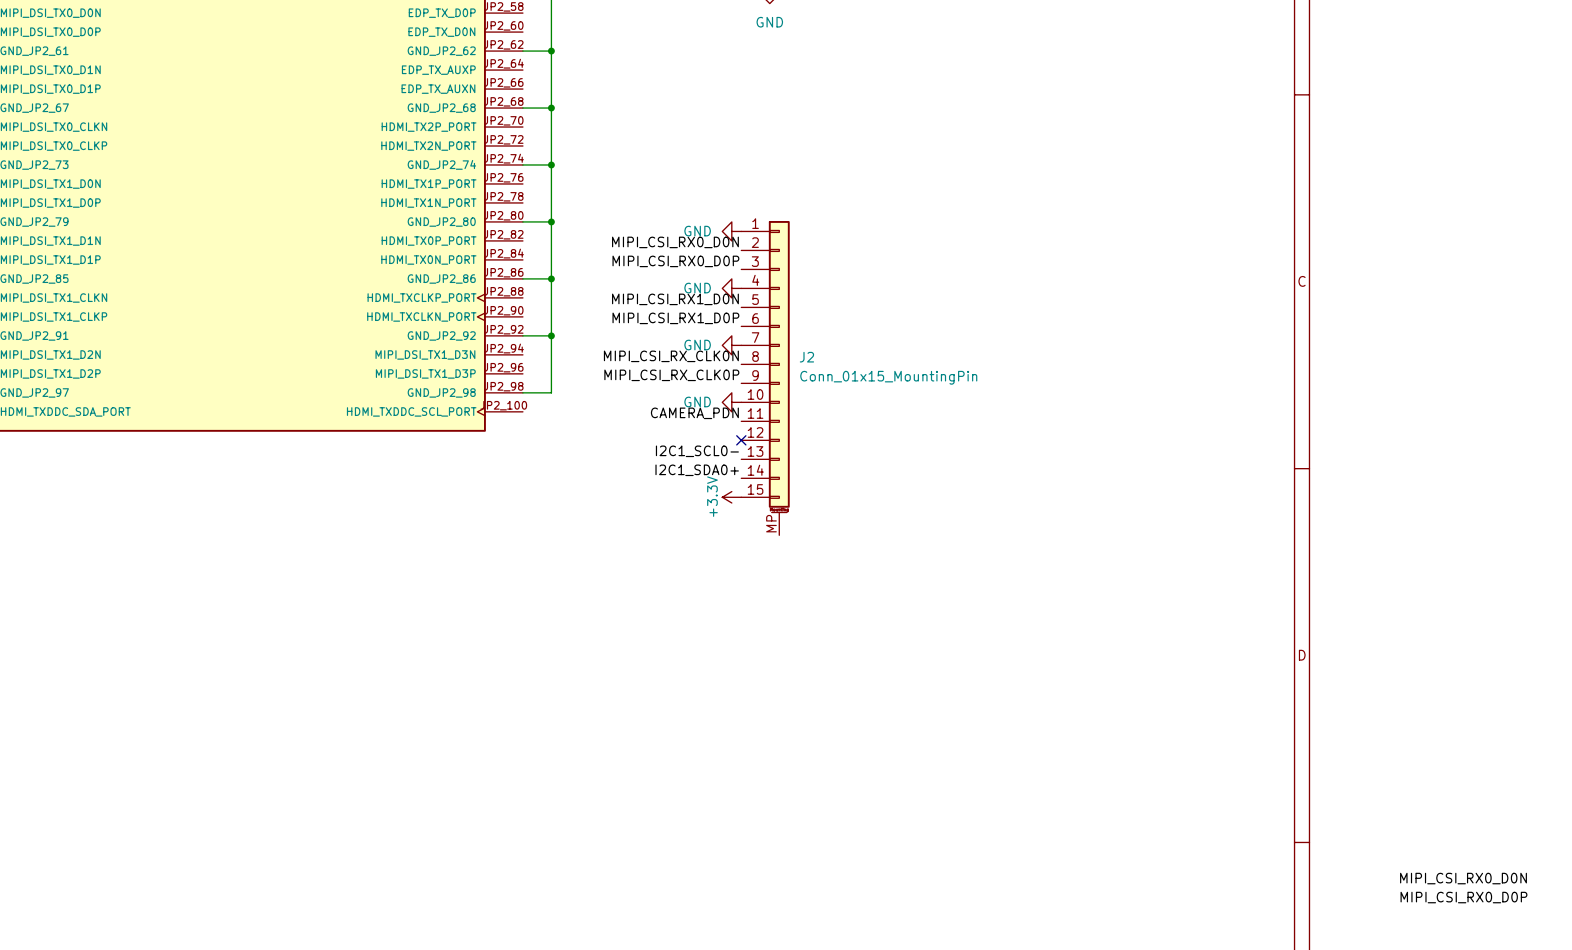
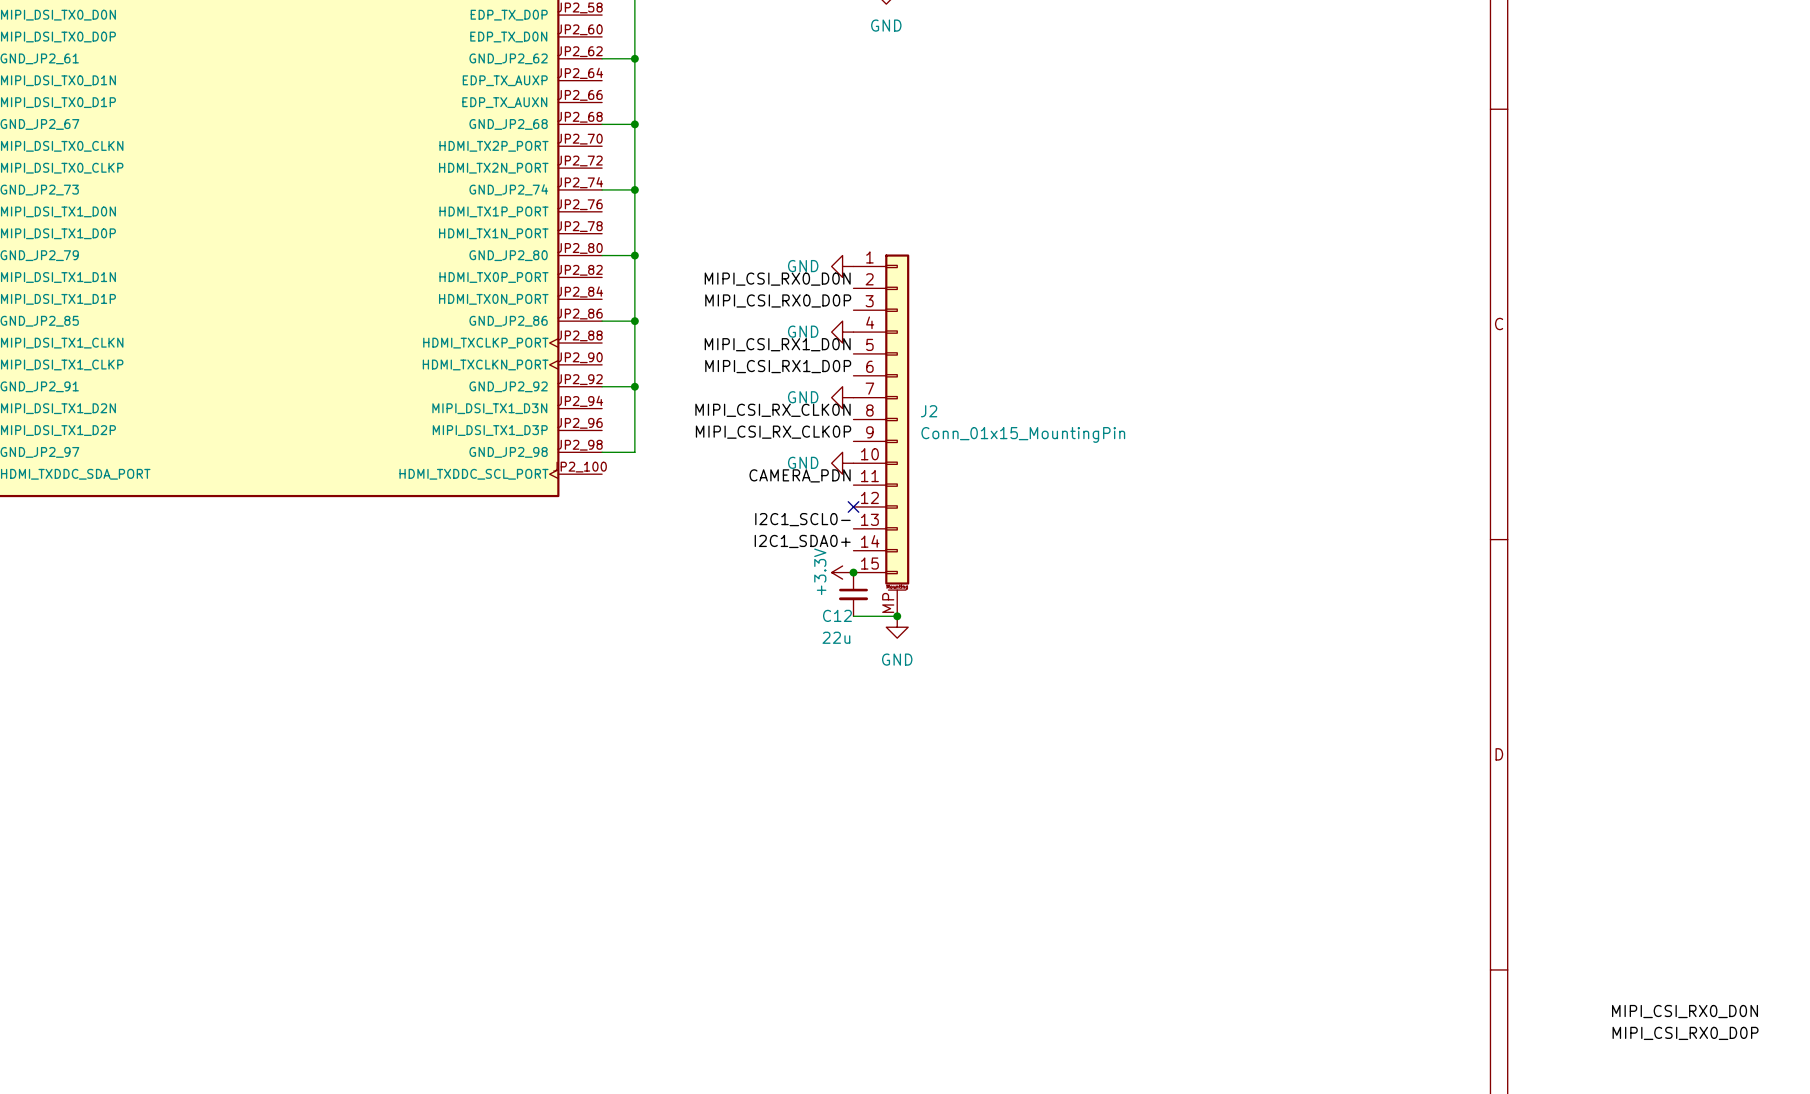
junction: none -> (853, 572)
C12: none -> 22u (853, 594)
wire: none -> (853, 616) (897, 616)
junction: none -> (897, 616)
power symbol: none -> GND (897, 627)

